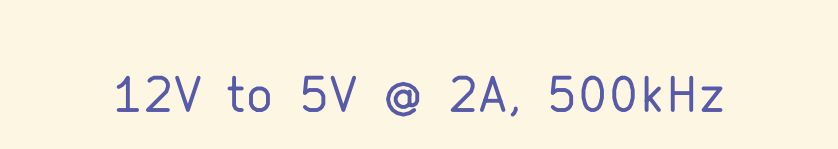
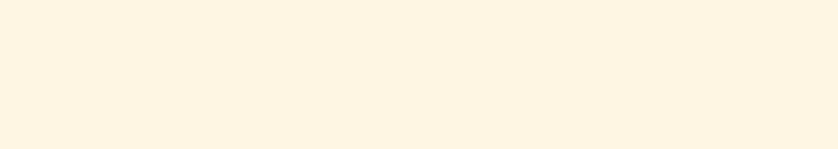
text: 12V to 5V @ 2A, 500kHz (419, 96) -> none

